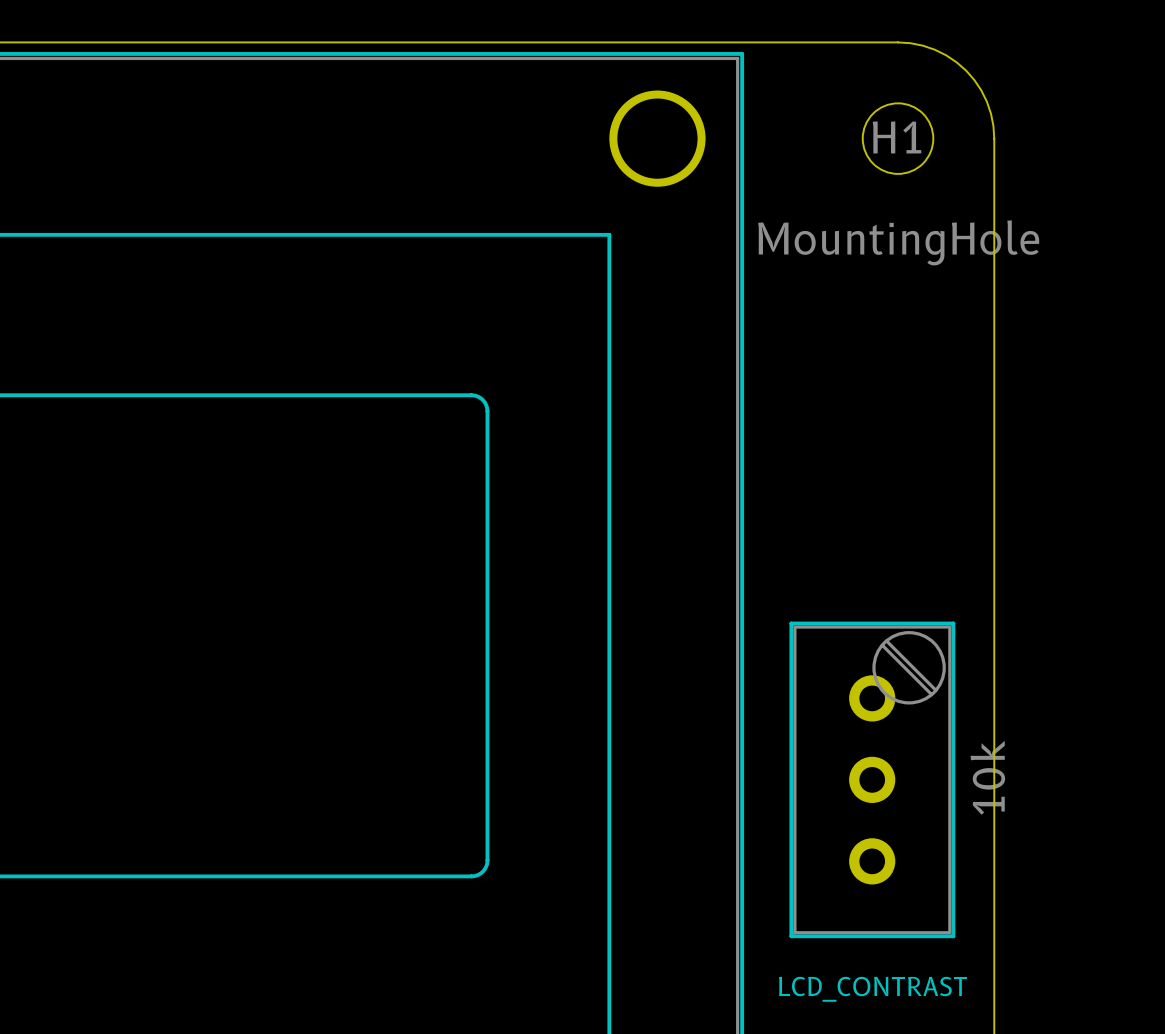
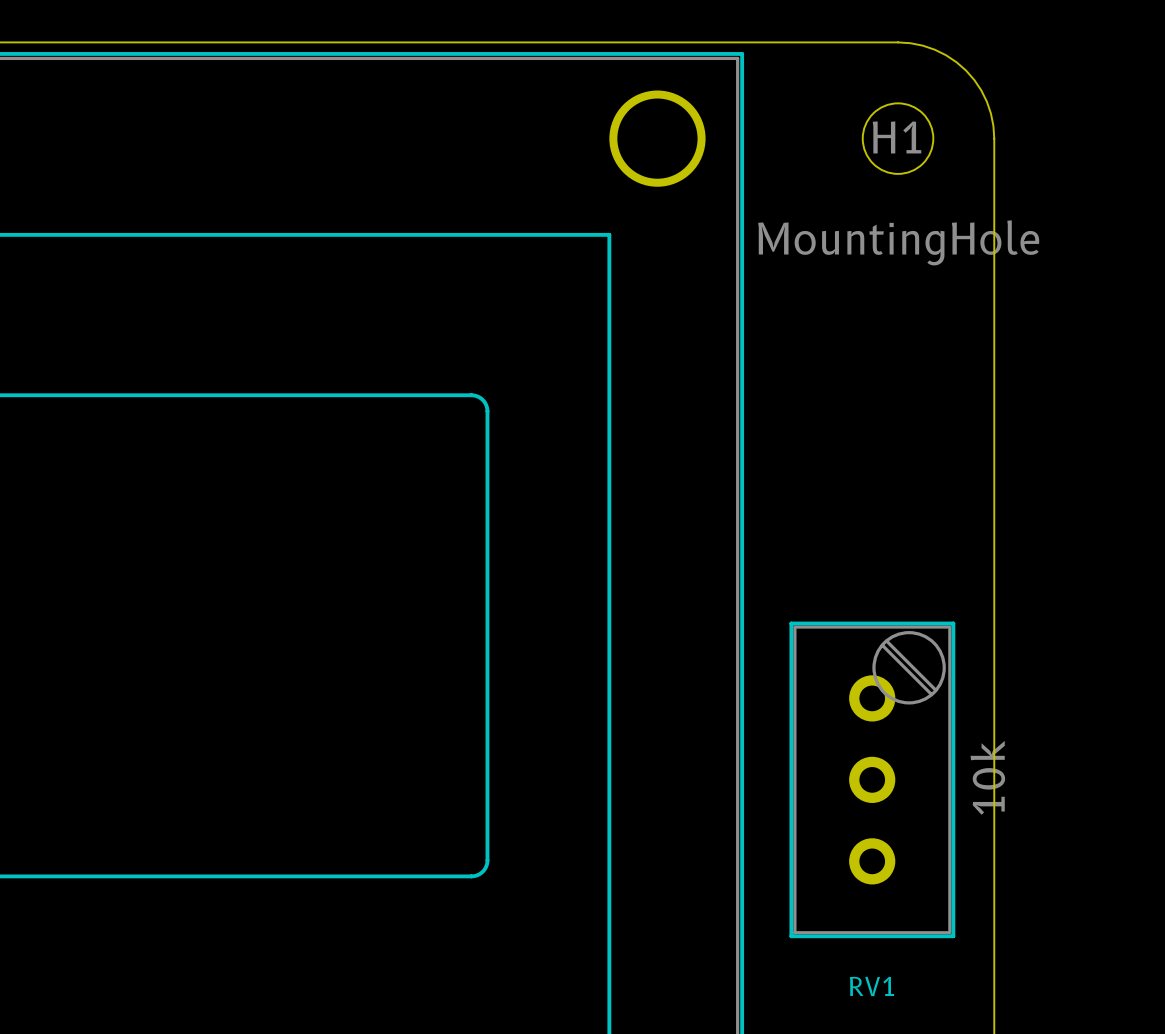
LCD_CONTRAST name: LCD_CONTRAST (873, 989) -> RV1 (871, 986)

